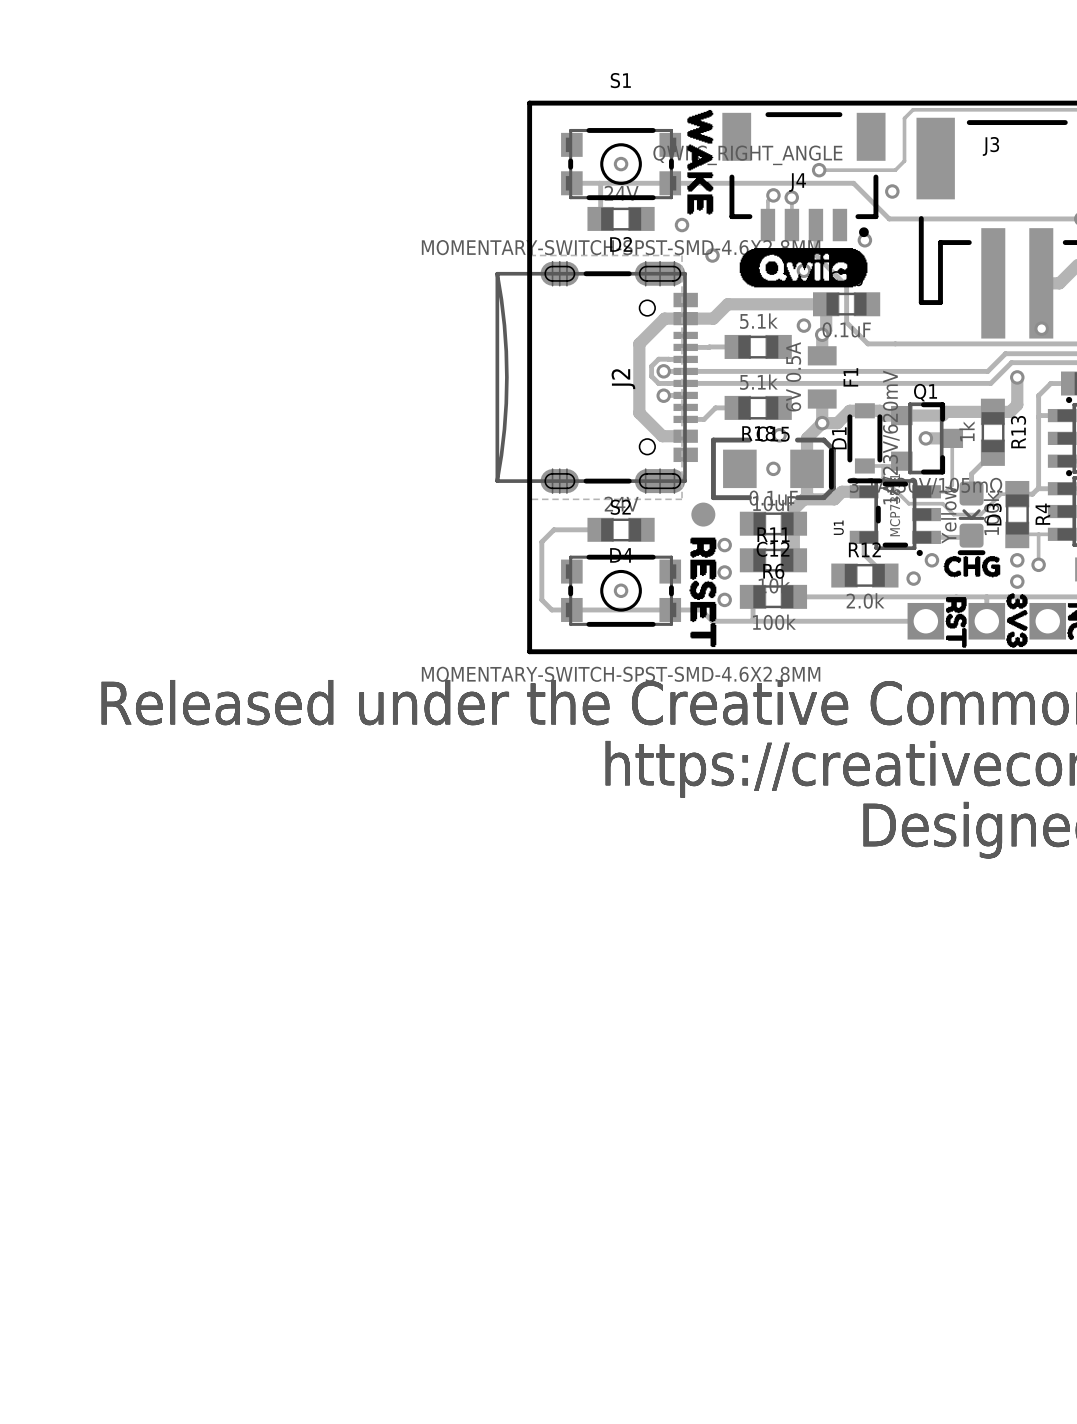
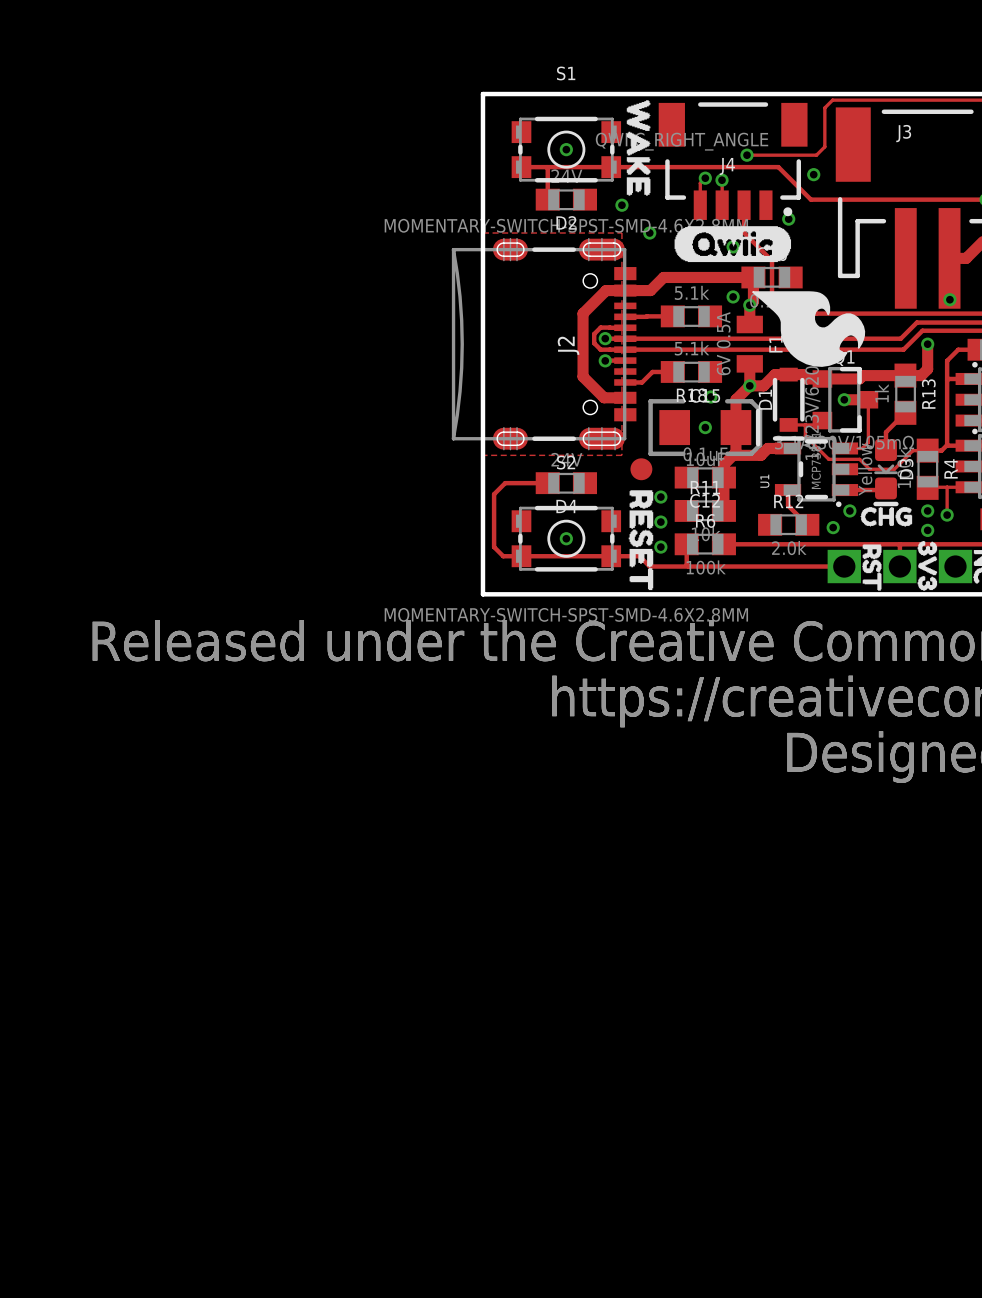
drawing: none -> [752, 291, 866, 367]

